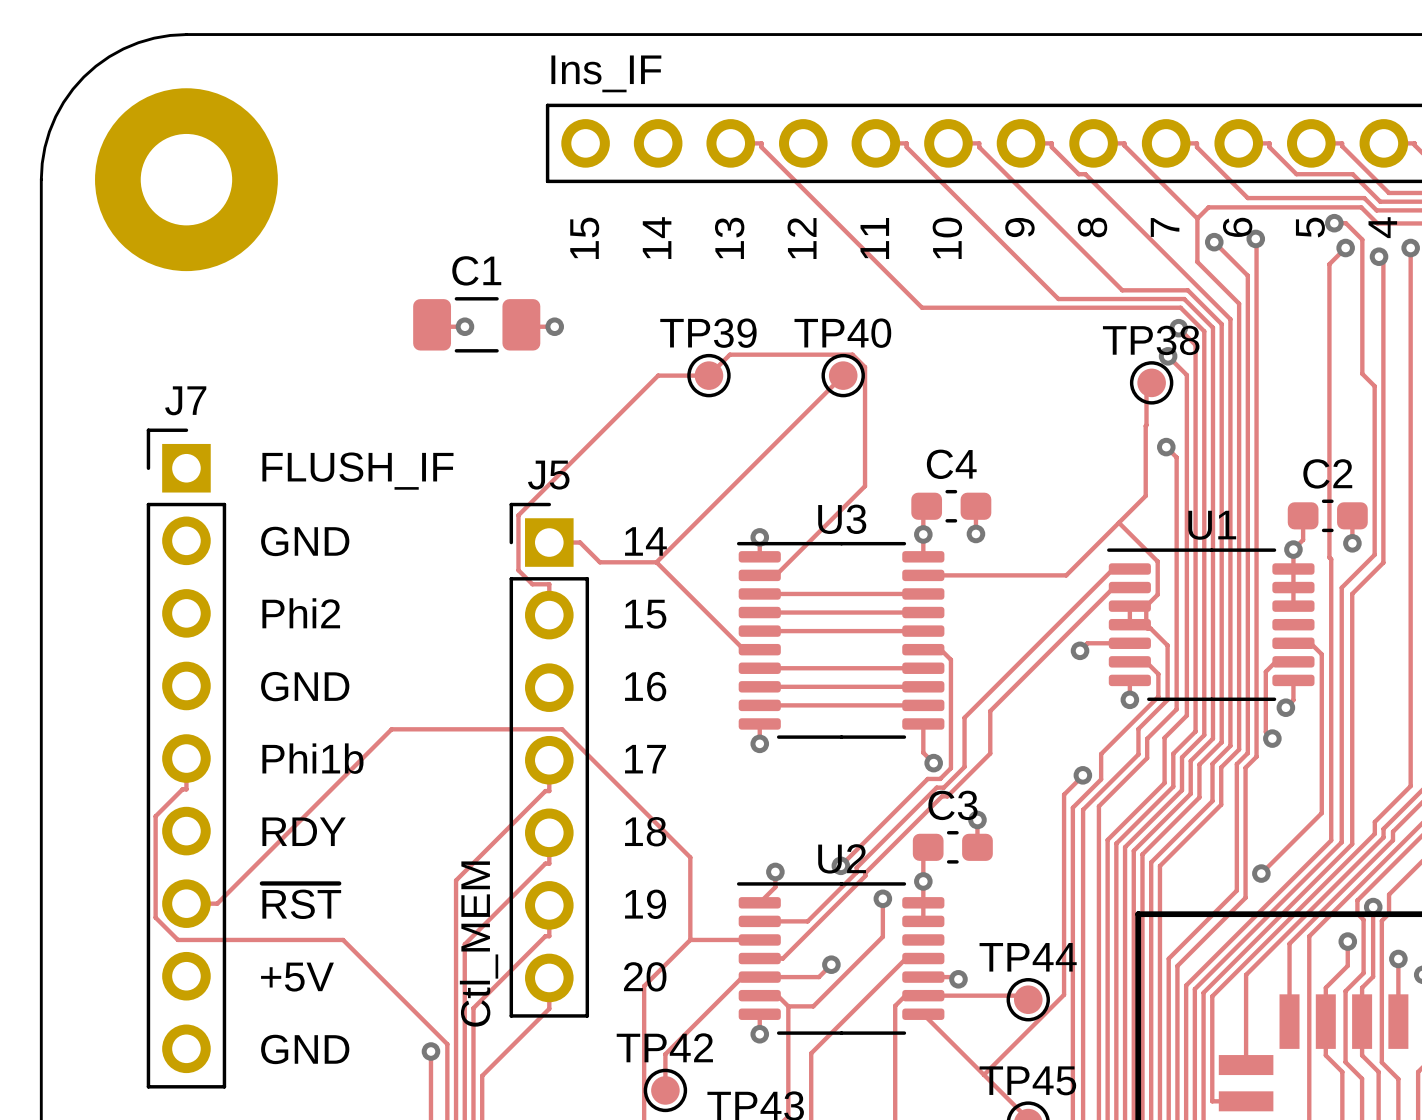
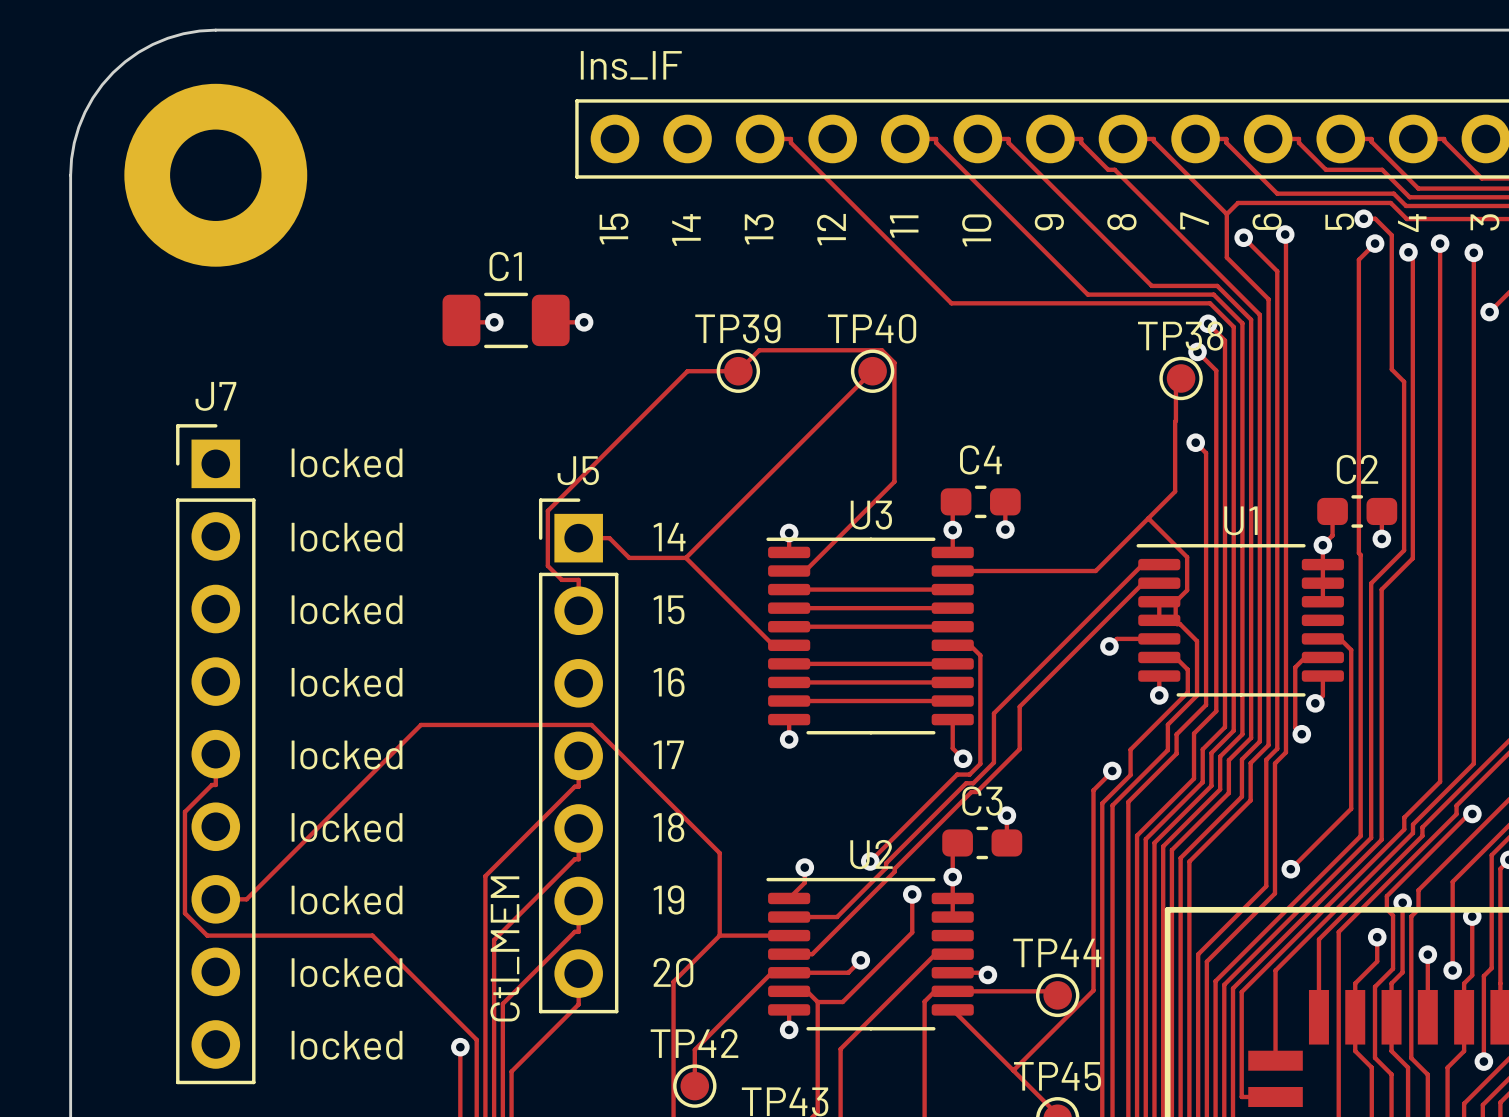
text: FLUSH_IF (357, 471) -> locked (347, 462)
text: GND (305, 541) -> locked (347, 537)
text: Phi2 (301, 613) -> locked (347, 609)
text: GND (305, 686) -> locked (347, 682)
text: Phi1b (312, 758) -> locked (347, 754)
text: RDY (304, 831) -> locked (347, 827)
text: ~{RST} (301, 901) -> locked (347, 900)
text: +5V (297, 977) -> locked (347, 972)
text: GND (305, 1049) -> locked (347, 1045)

